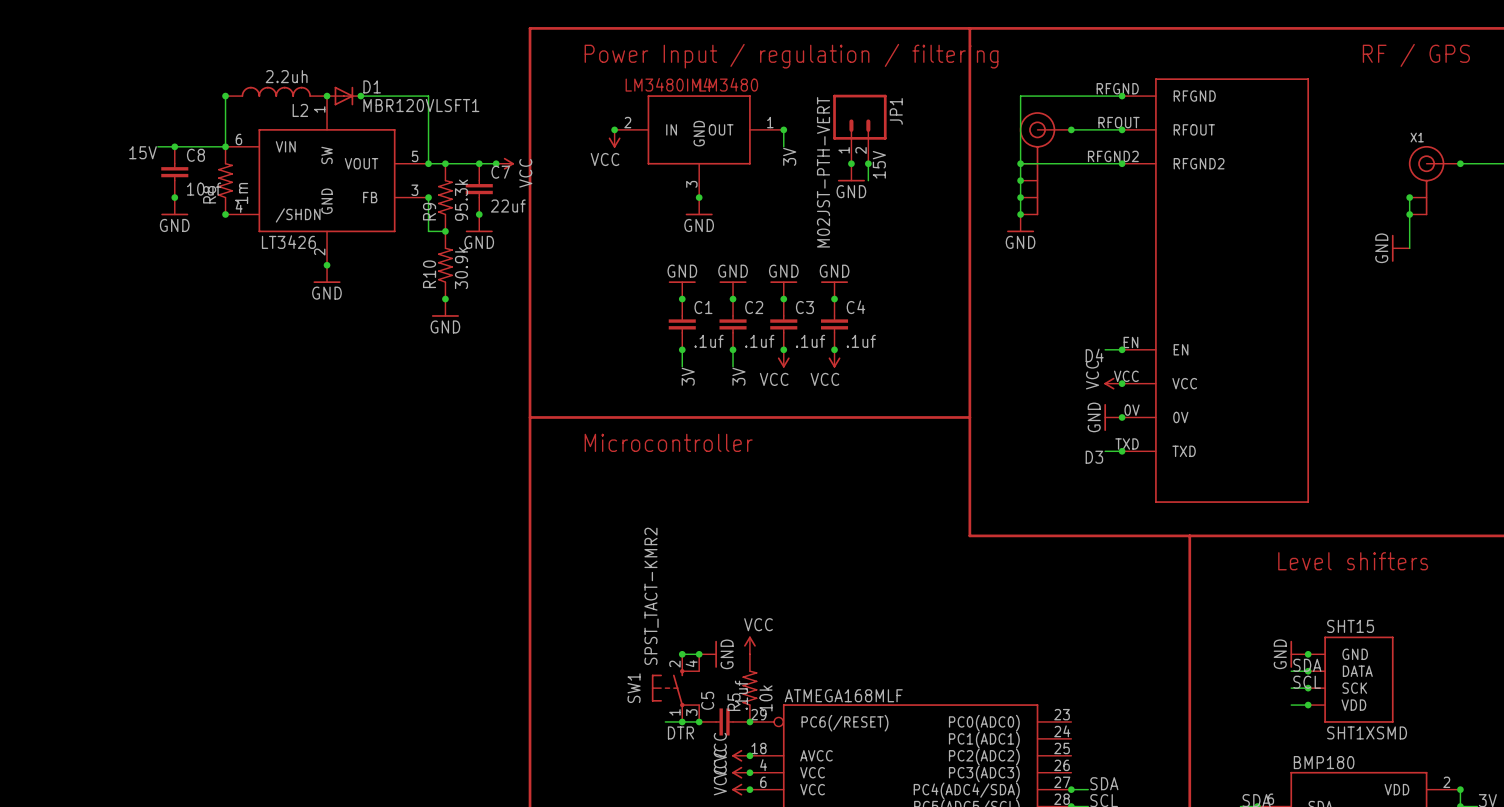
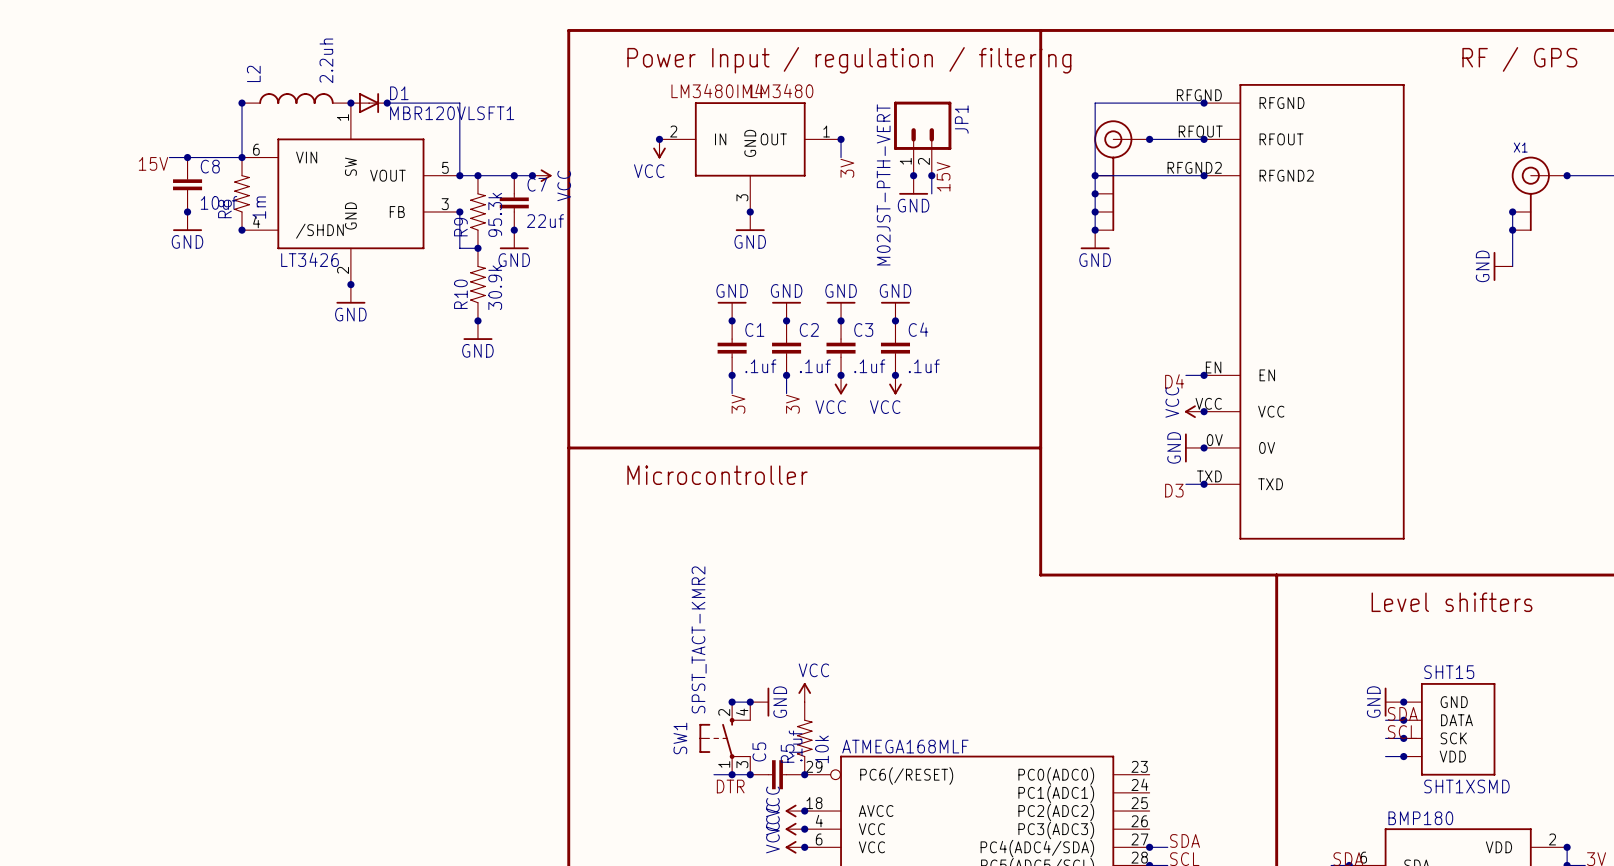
L2 value rotation: 0° (286, 76) -> 90° counterclockwise (326, 60)
L2 name rotation: 0° (300, 110) -> 90° counterclockwise (253, 73)
L2 name position: L2 (300, 110) -> L2 (253, 73)

